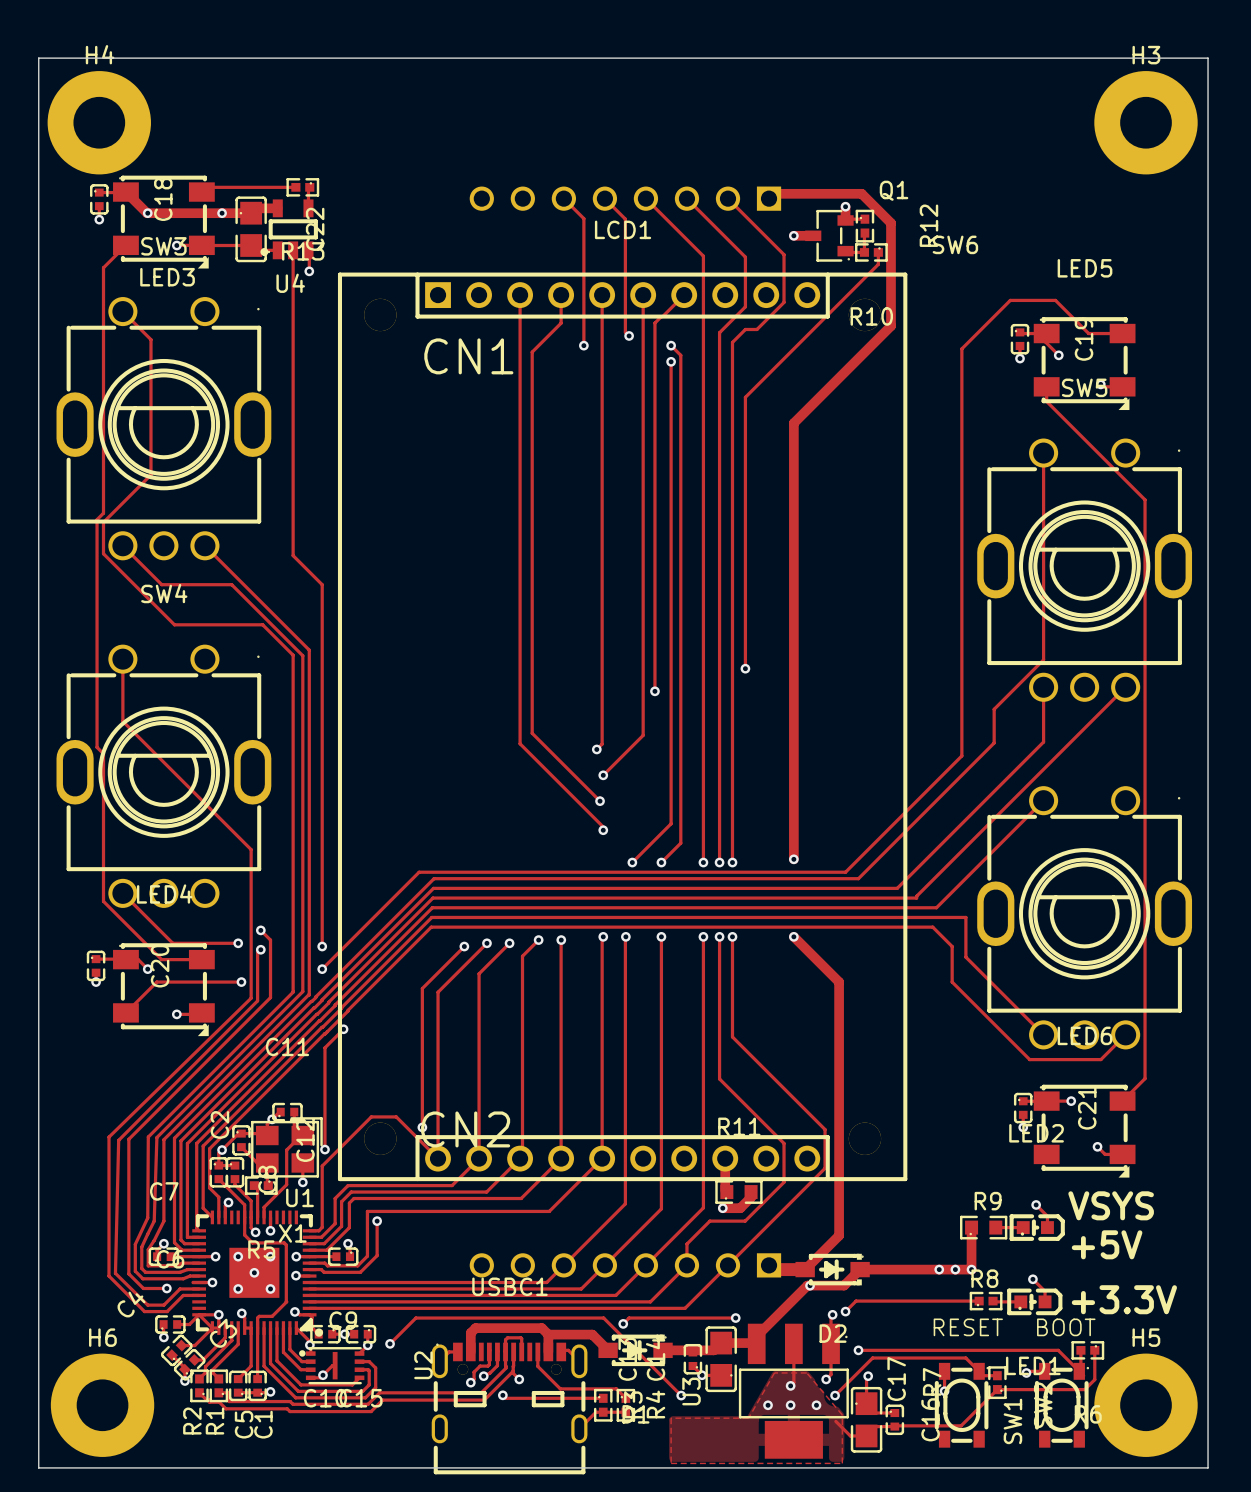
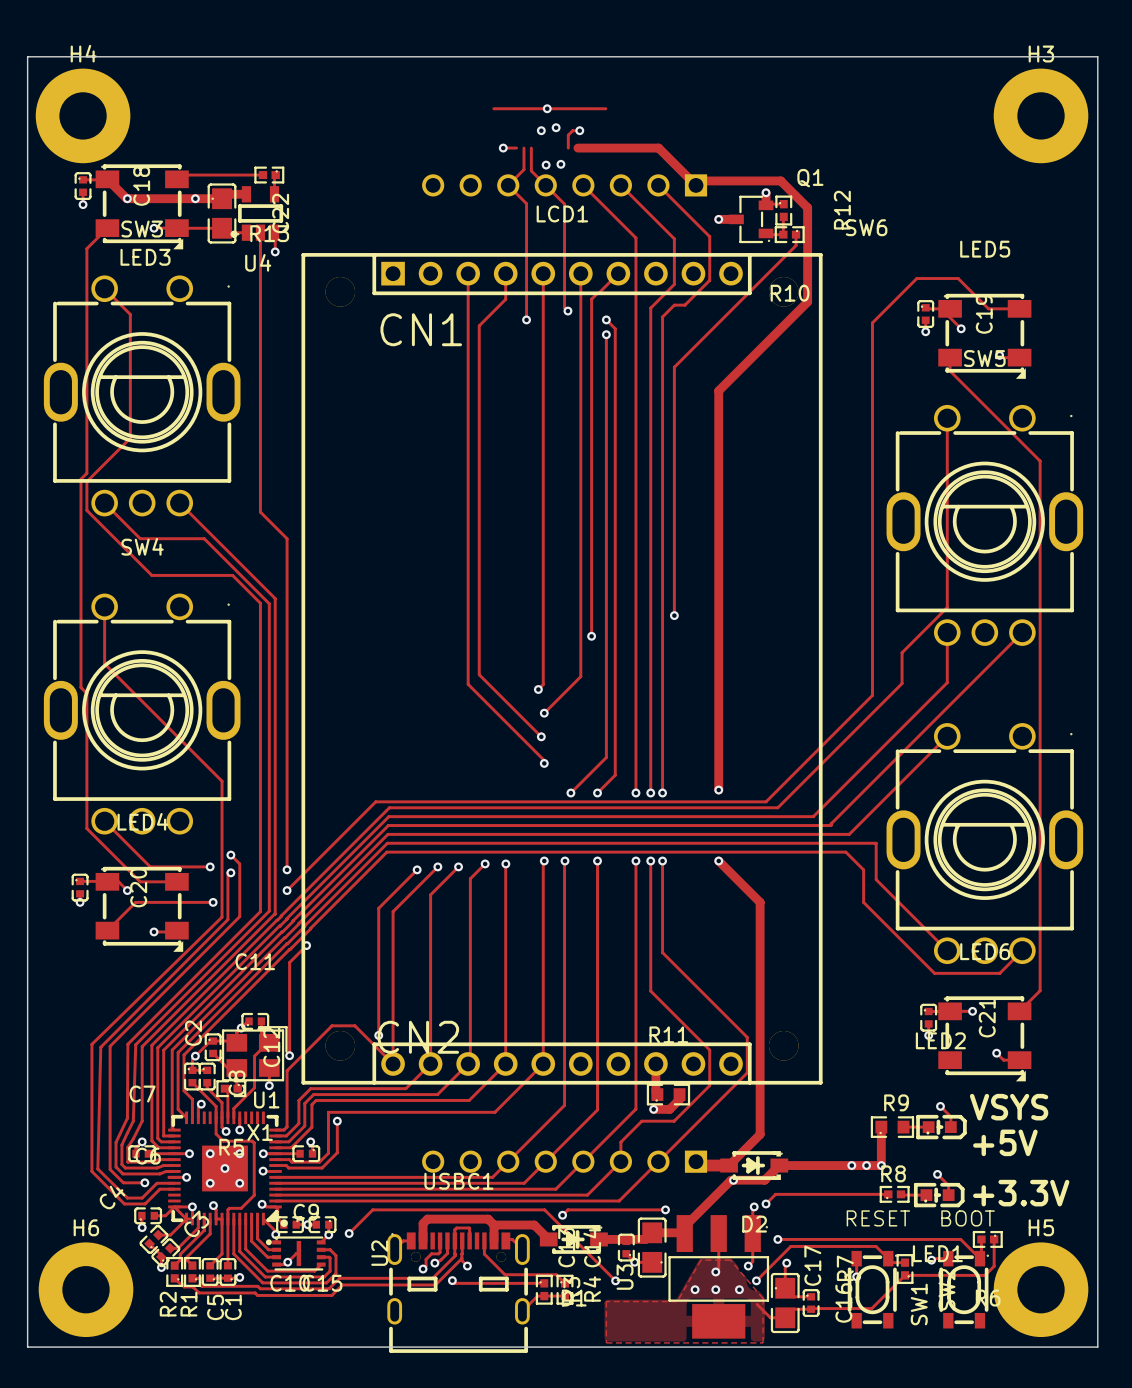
track: none -> (493, 108) (605, 108)
via: none -> (547, 108)
via: none -> (556, 127)
via: none -> (541, 130)
track: none -> (579, 130) (572, 130) (568, 135) (568, 148)
via: none -> (579, 130)
via: none -> (503, 148)
track: none -> (516, 148) (502, 148)
track: none -> (523, 148) (523, 169) (508, 185)
track: none -> (531, 148) (531, 170) (545, 185)
track: none -> (577, 148) (658, 148) (696, 185)
via: none -> (560, 164)
via: none -> (546, 165)

